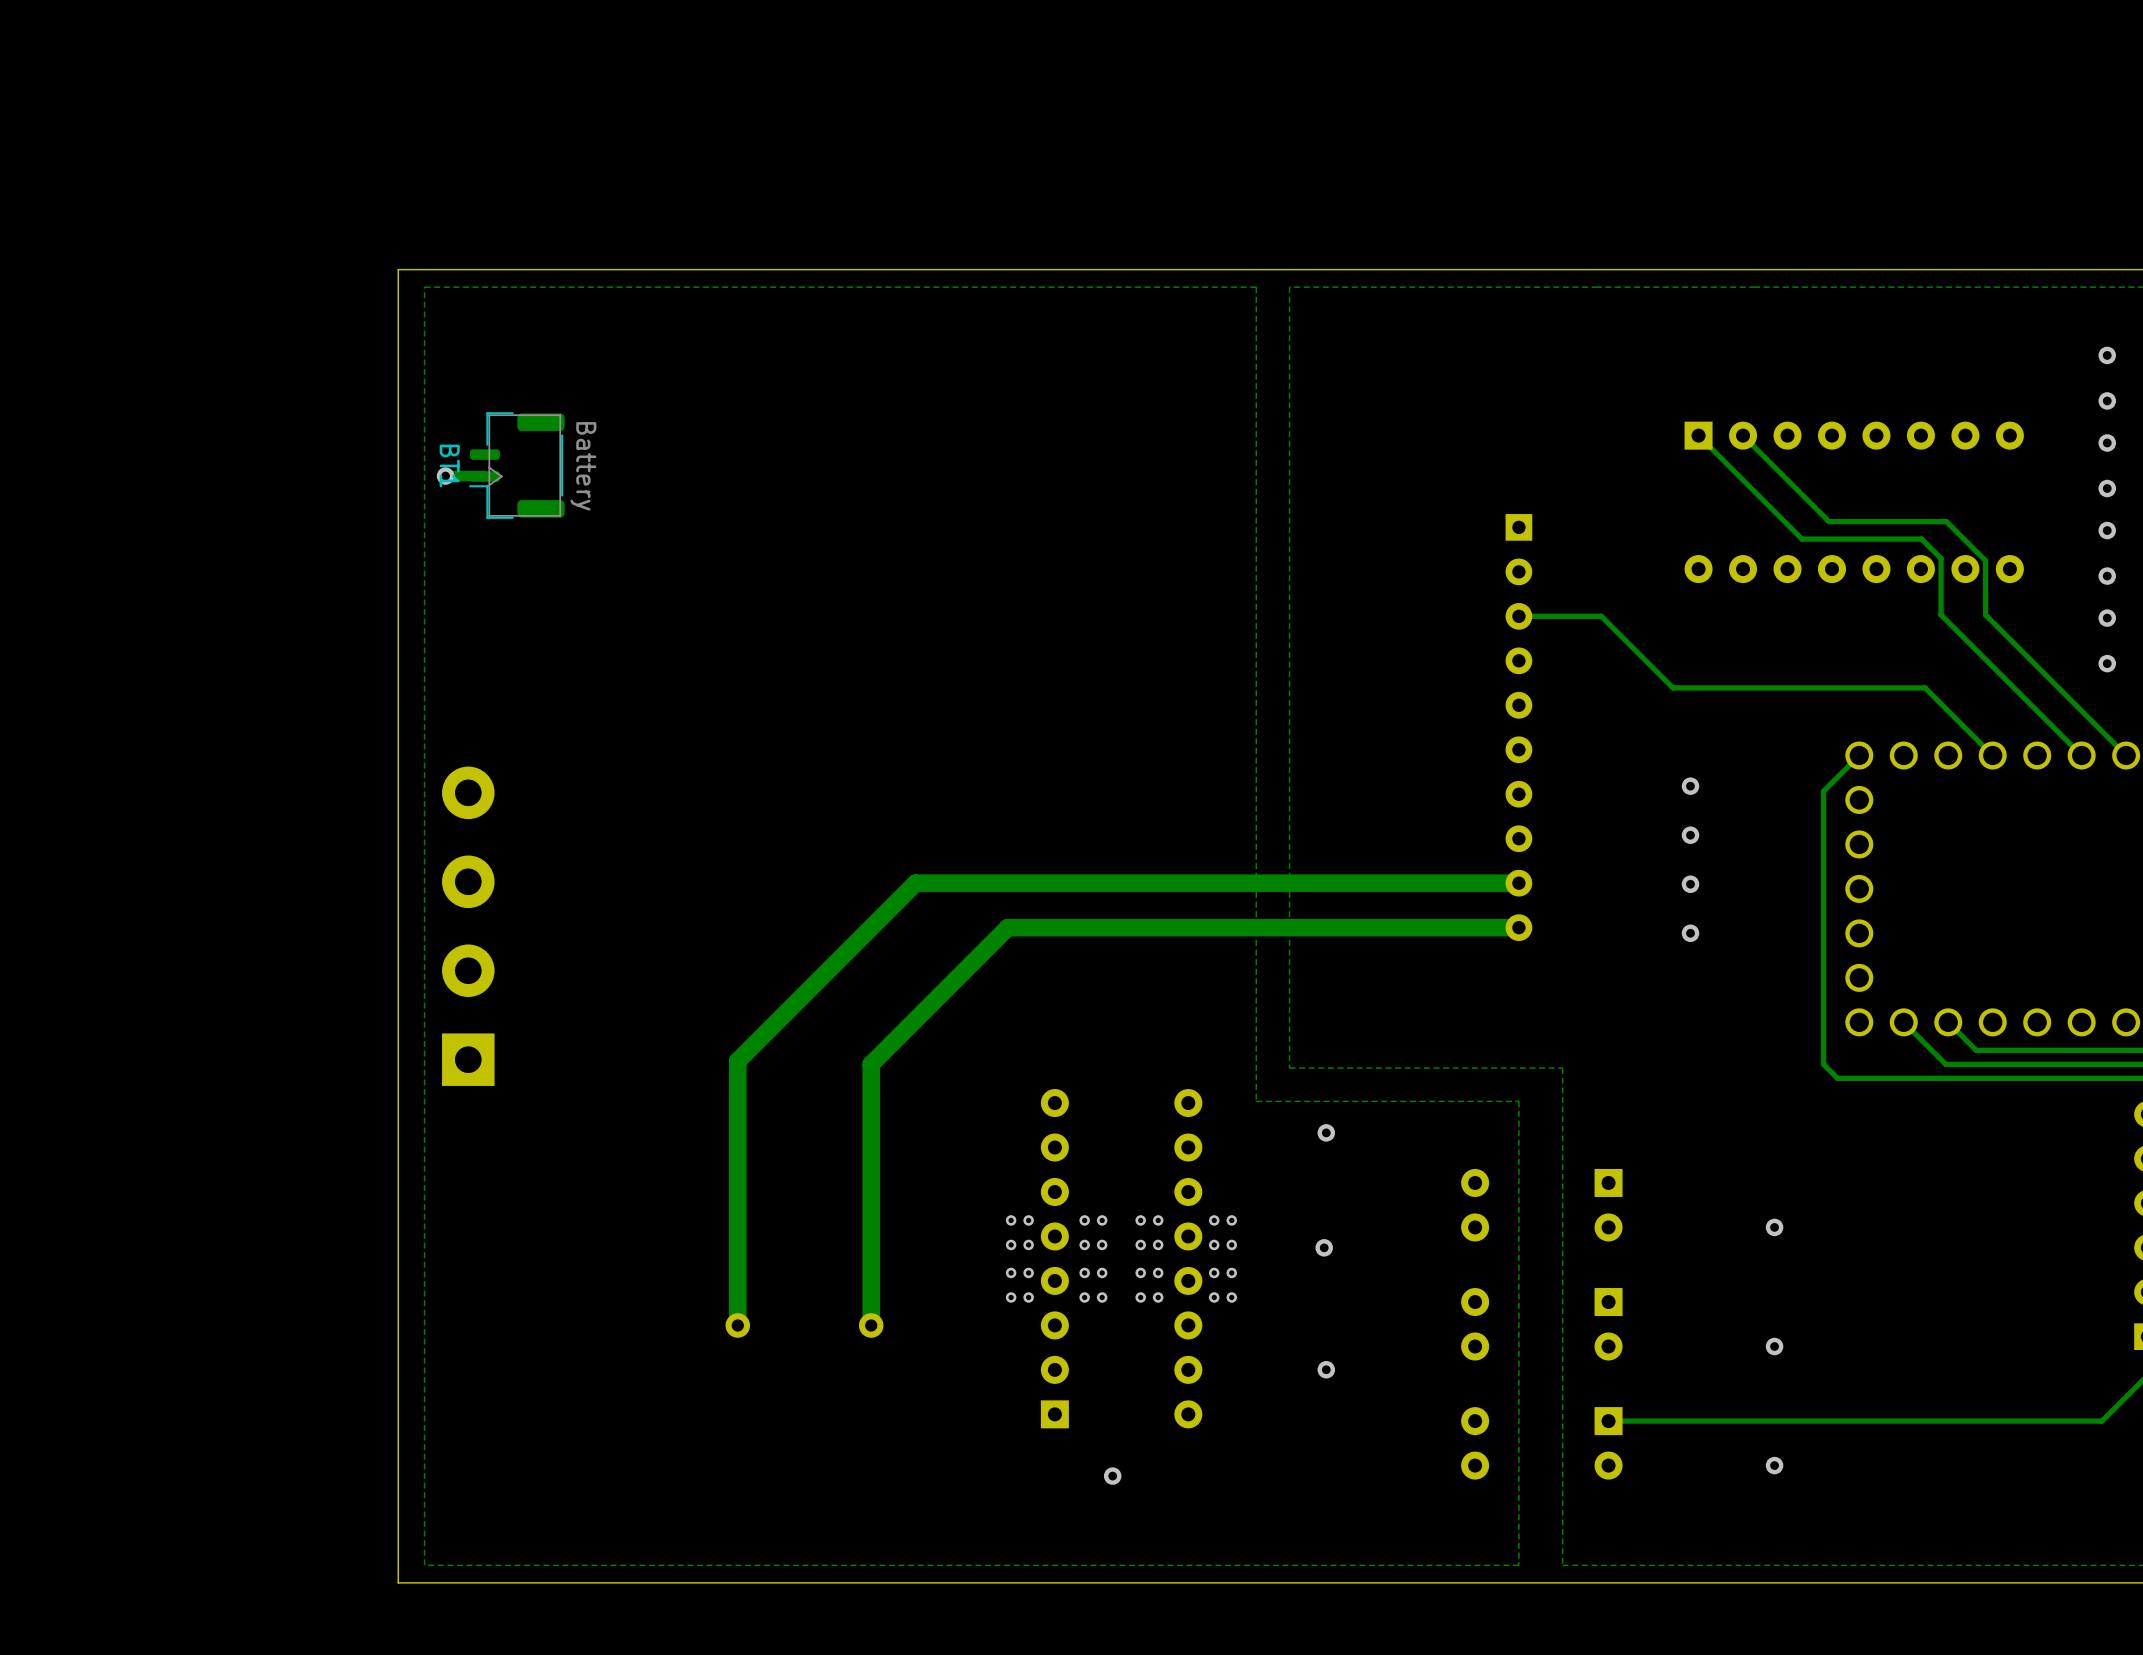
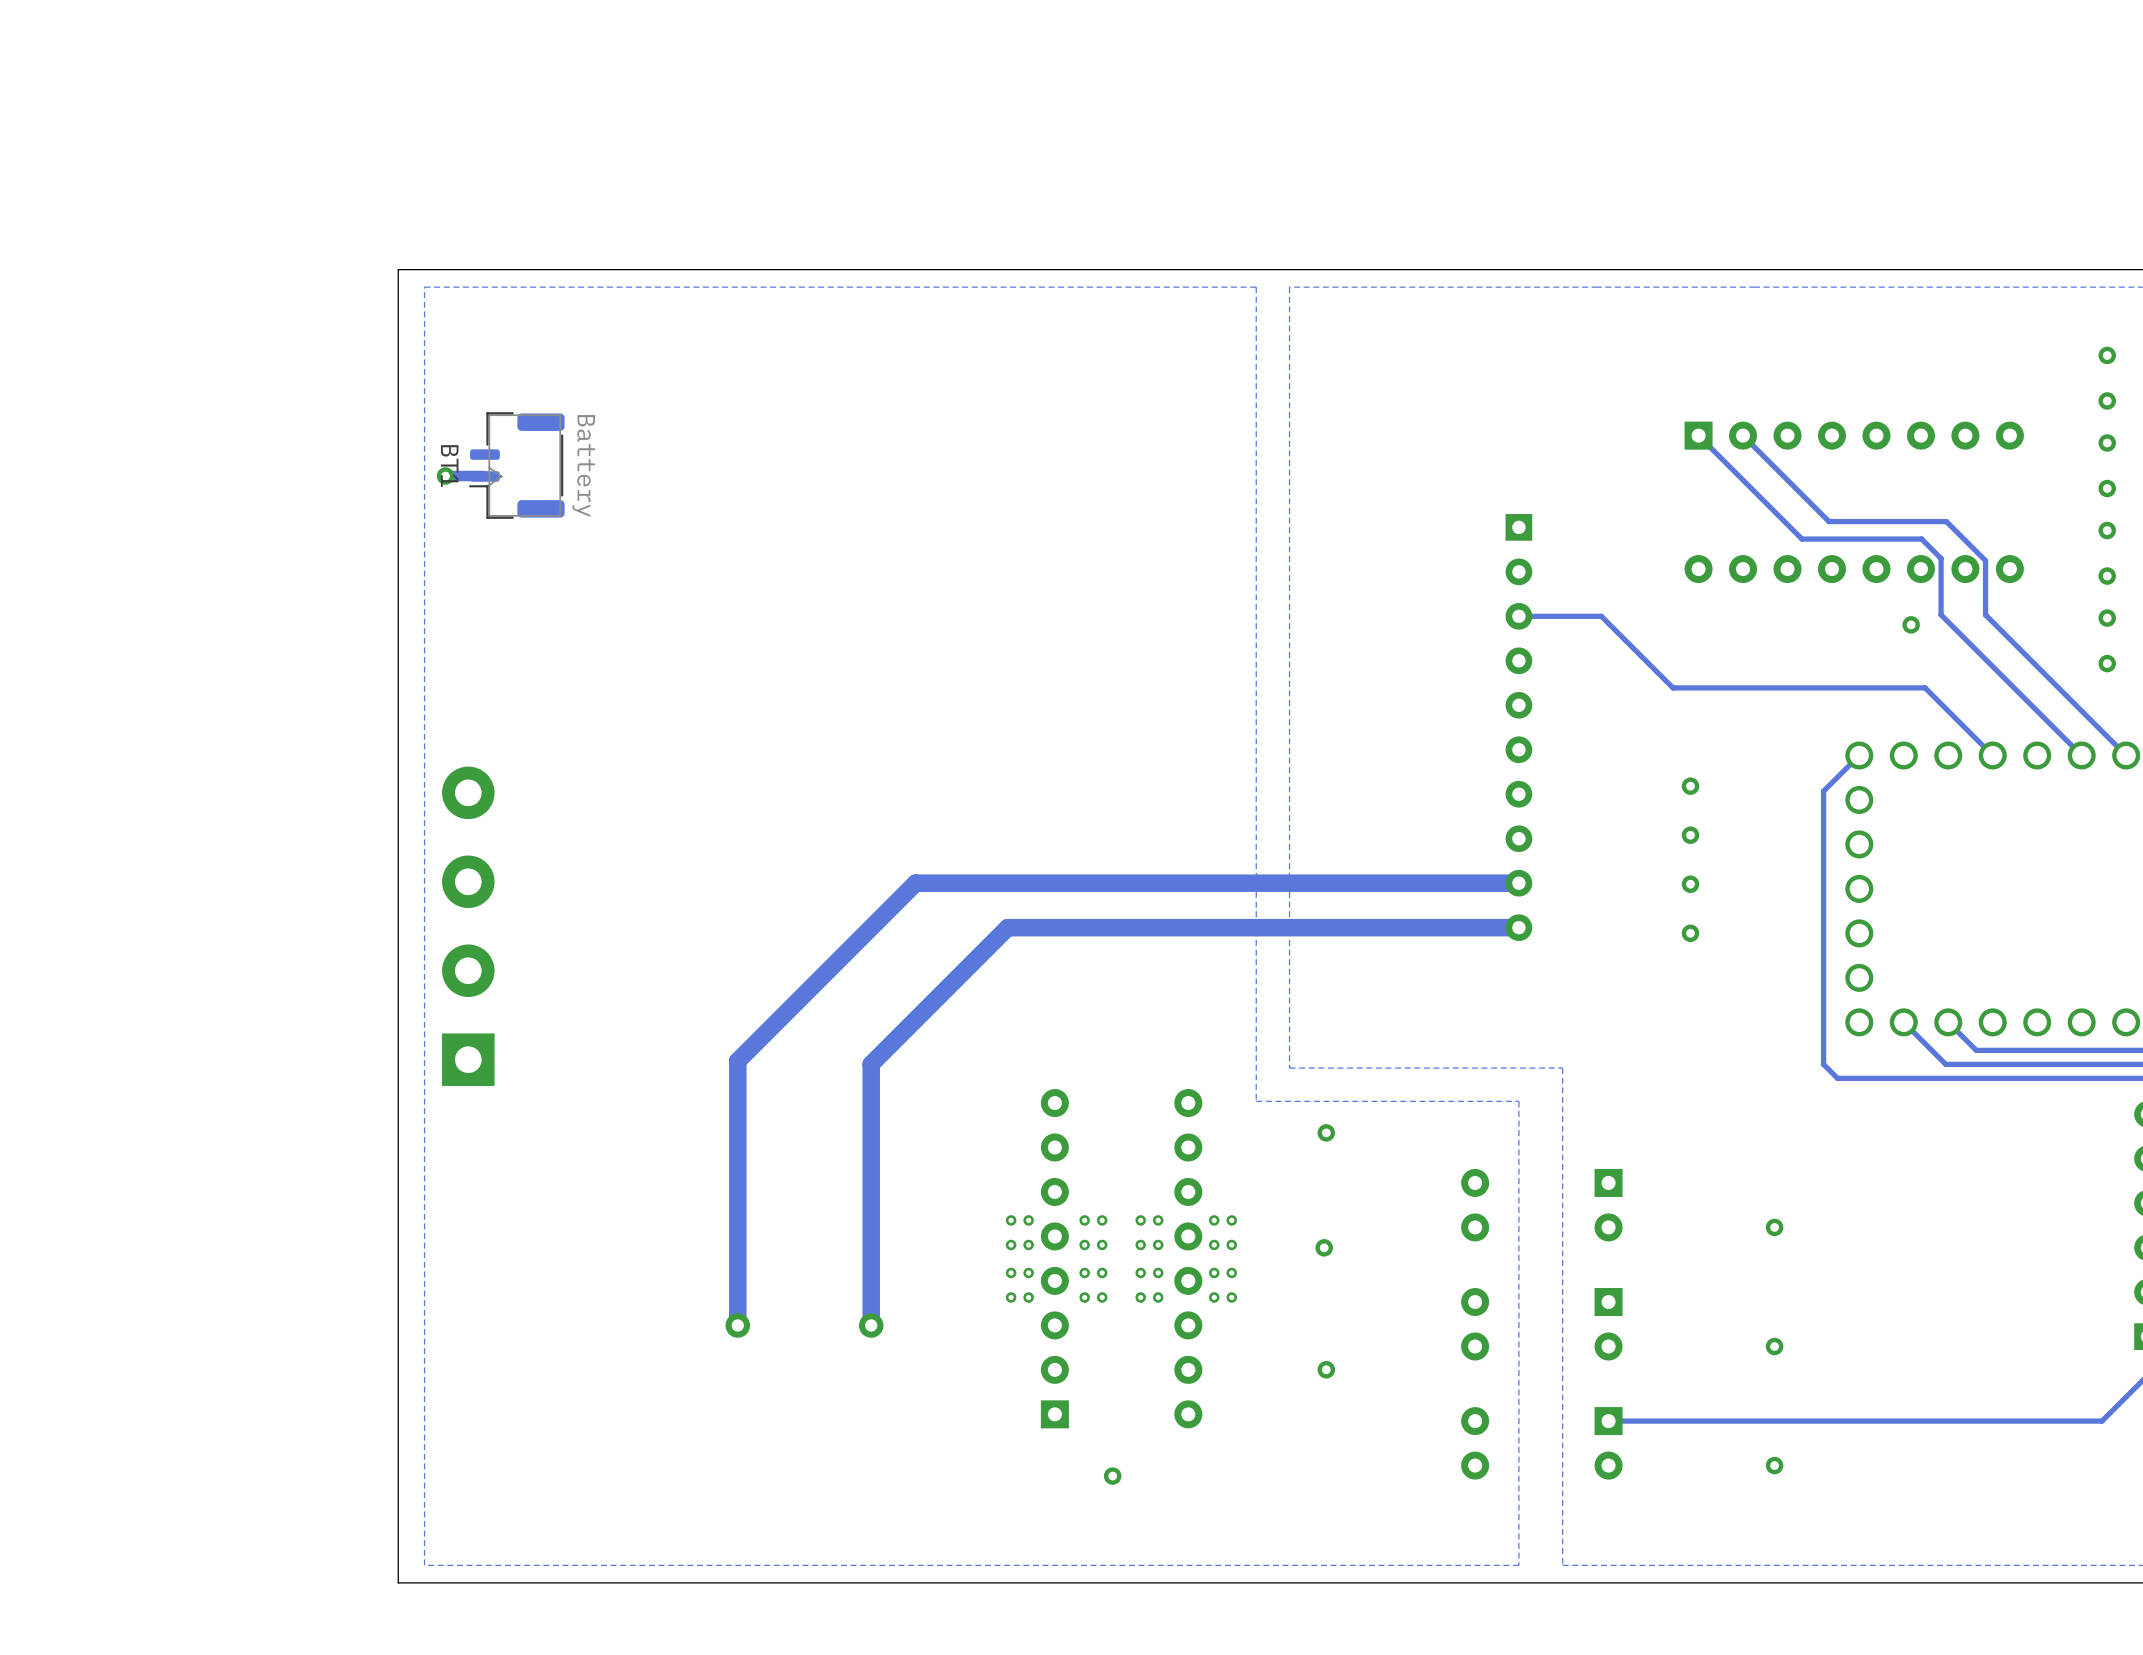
via: none -> (1911, 624)

